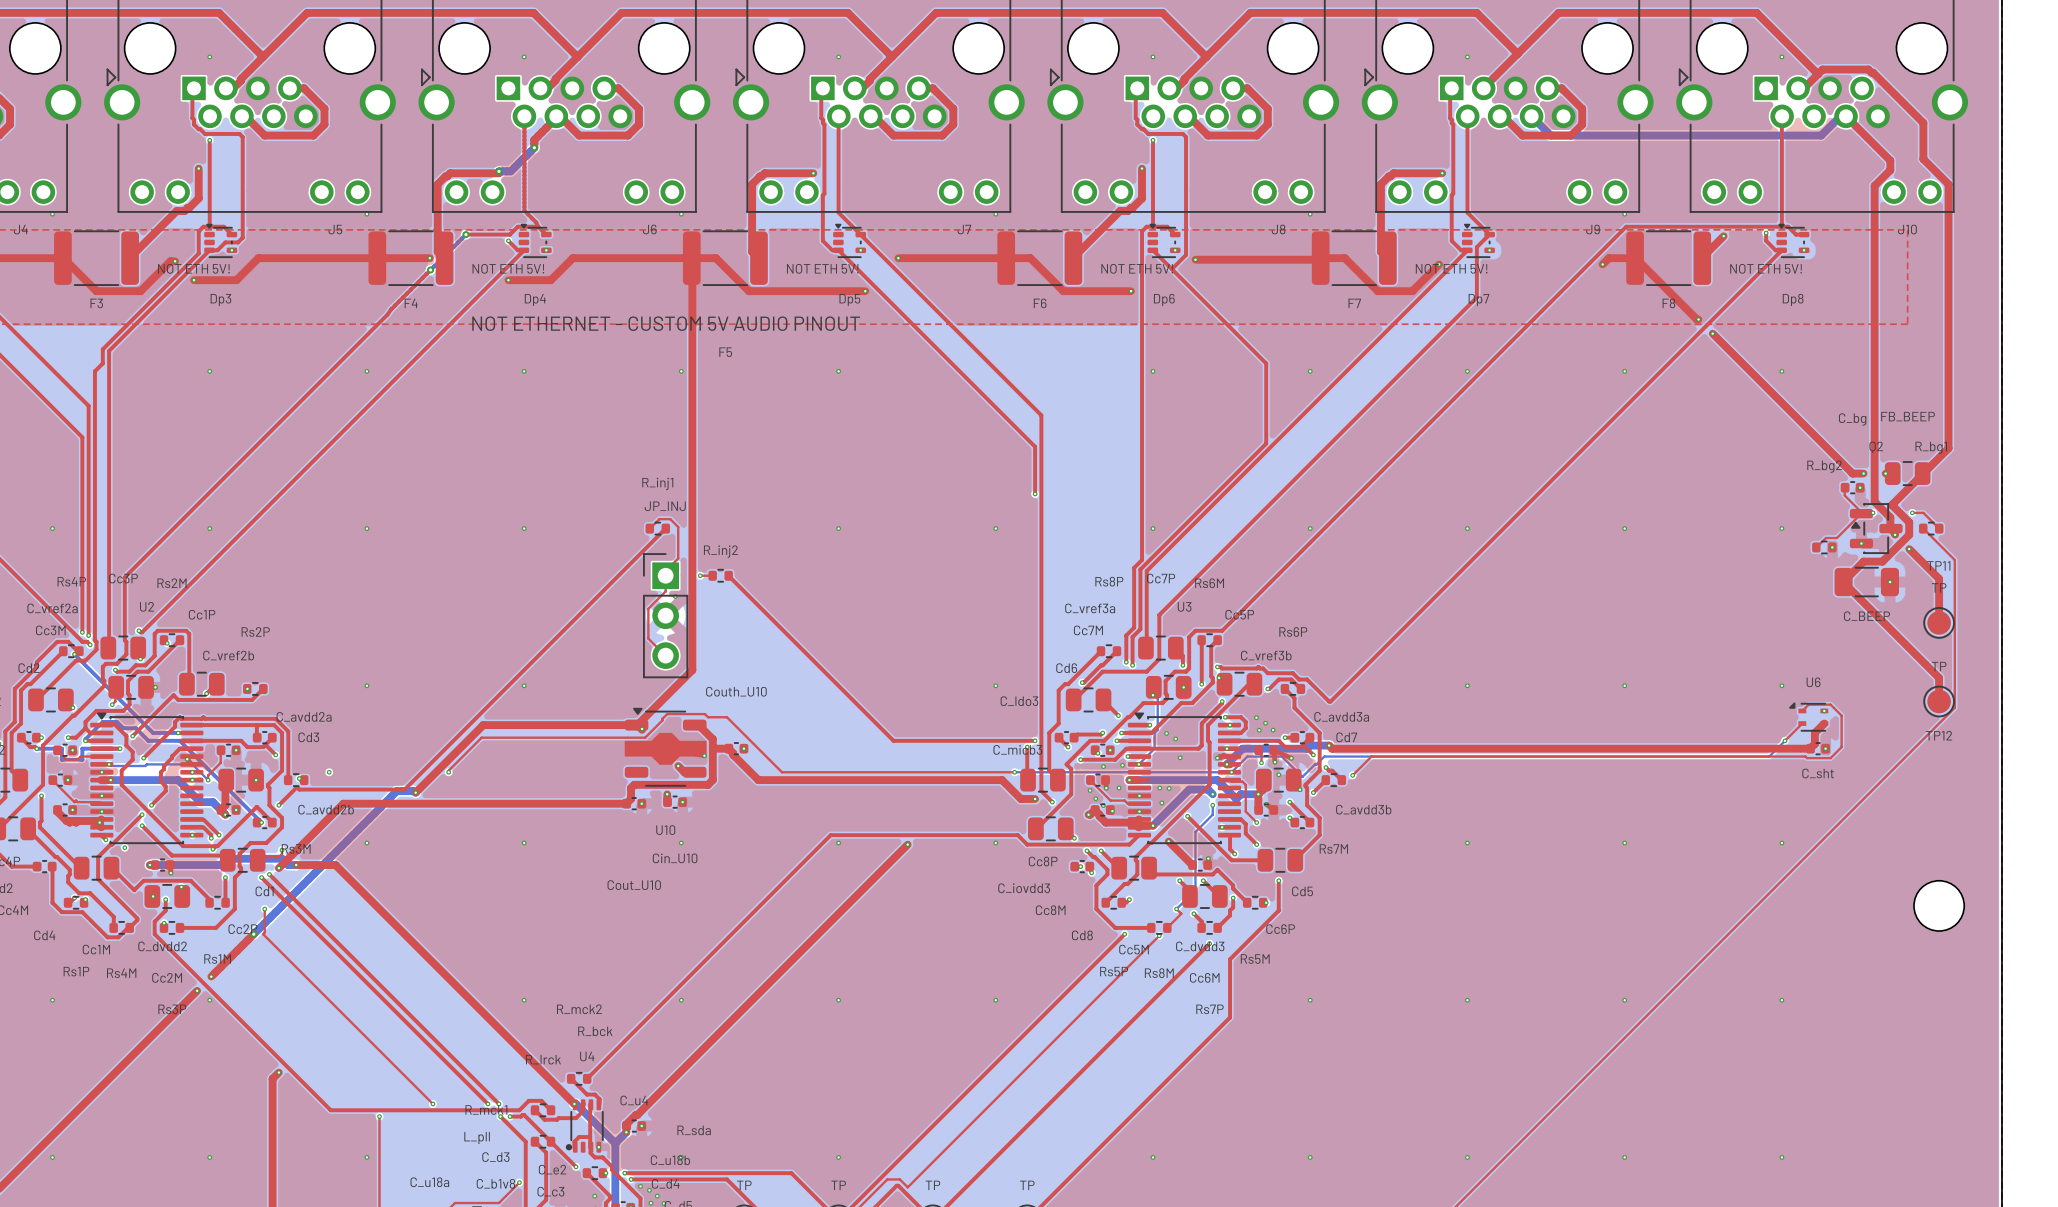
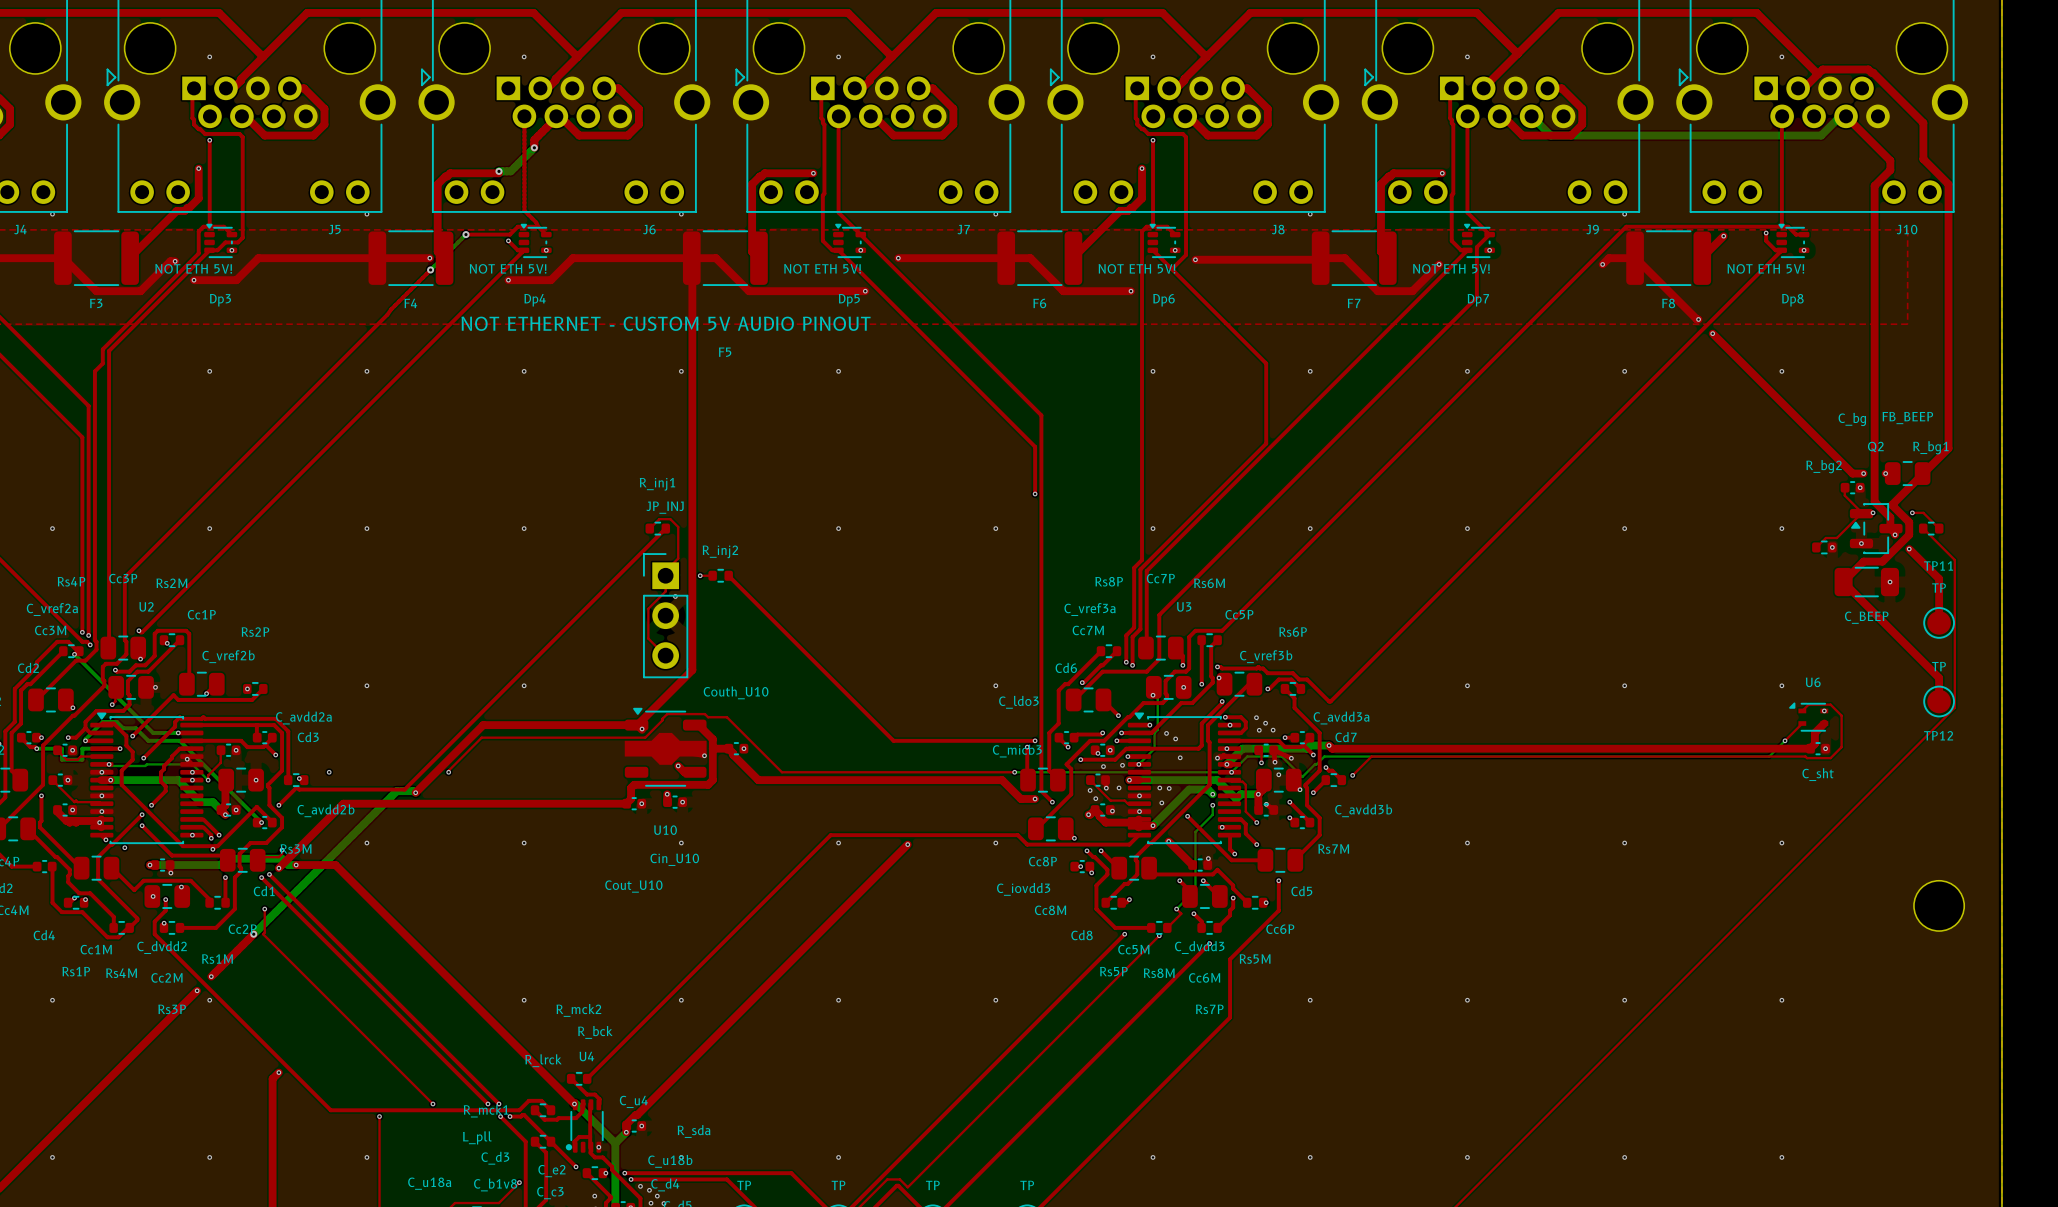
via: (1103, 805) -> none

